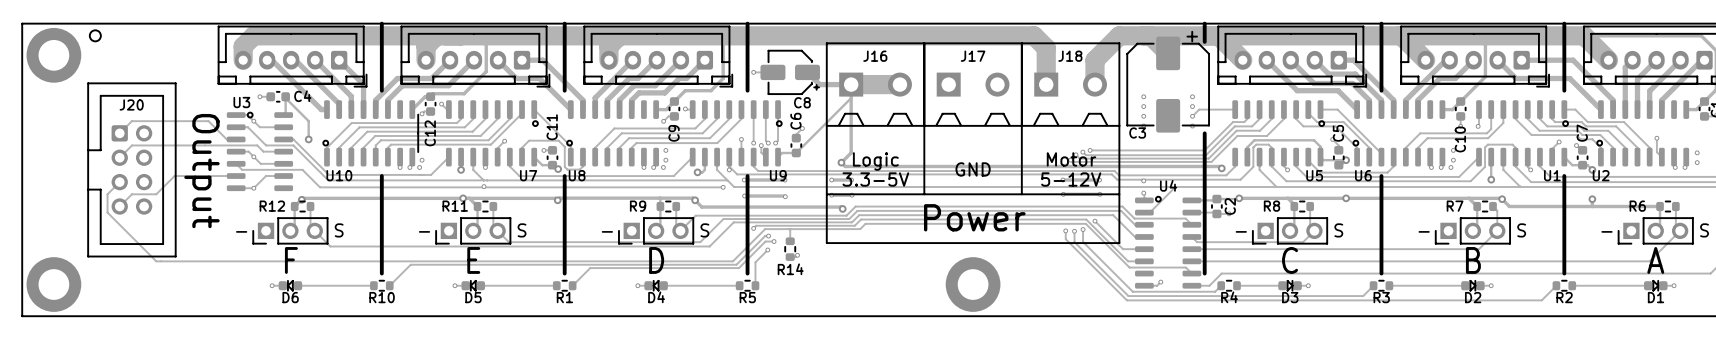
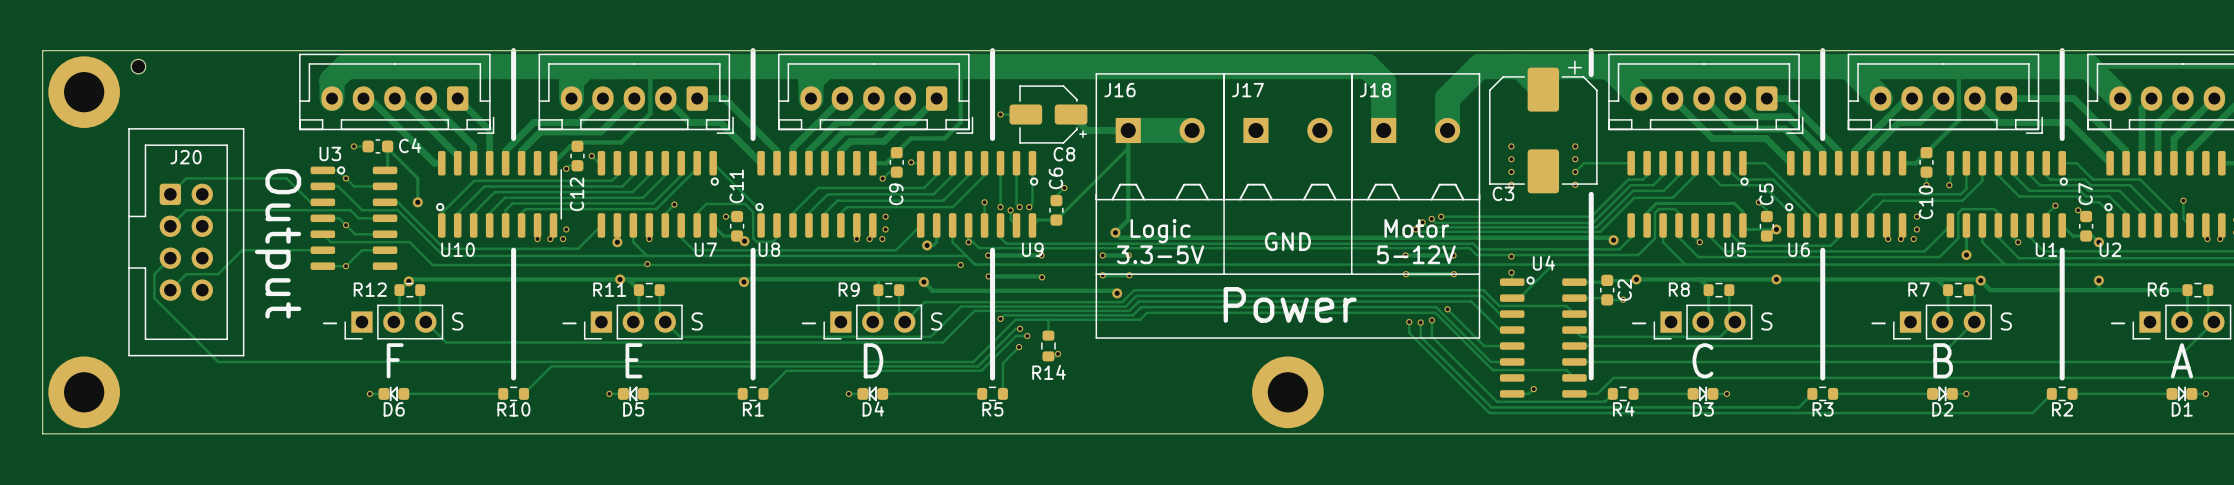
J16 footprint: [826, 42, 925, 127] -> [1095, 73, 1225, 201]
J17 footprint: [923, 42, 1023, 127] -> [1223, 73, 1353, 201]
J18 footprint: [1021, 42, 1120, 127] -> [1351, 73, 1481, 201]
J16 name position: J16 (875, 56) -> J16 (1119, 90)
J17 name position: J17 (973, 56) -> J17 (1247, 90)
J18 name position: J18 (1070, 56) -> J18 (1375, 90)
line: (826, 125) (826, 133) -> none
line: (924, 125) (924, 133) -> none
line: (1021, 125) (1021, 133) -> none
line: (1119, 125) (1119, 133) -> none

